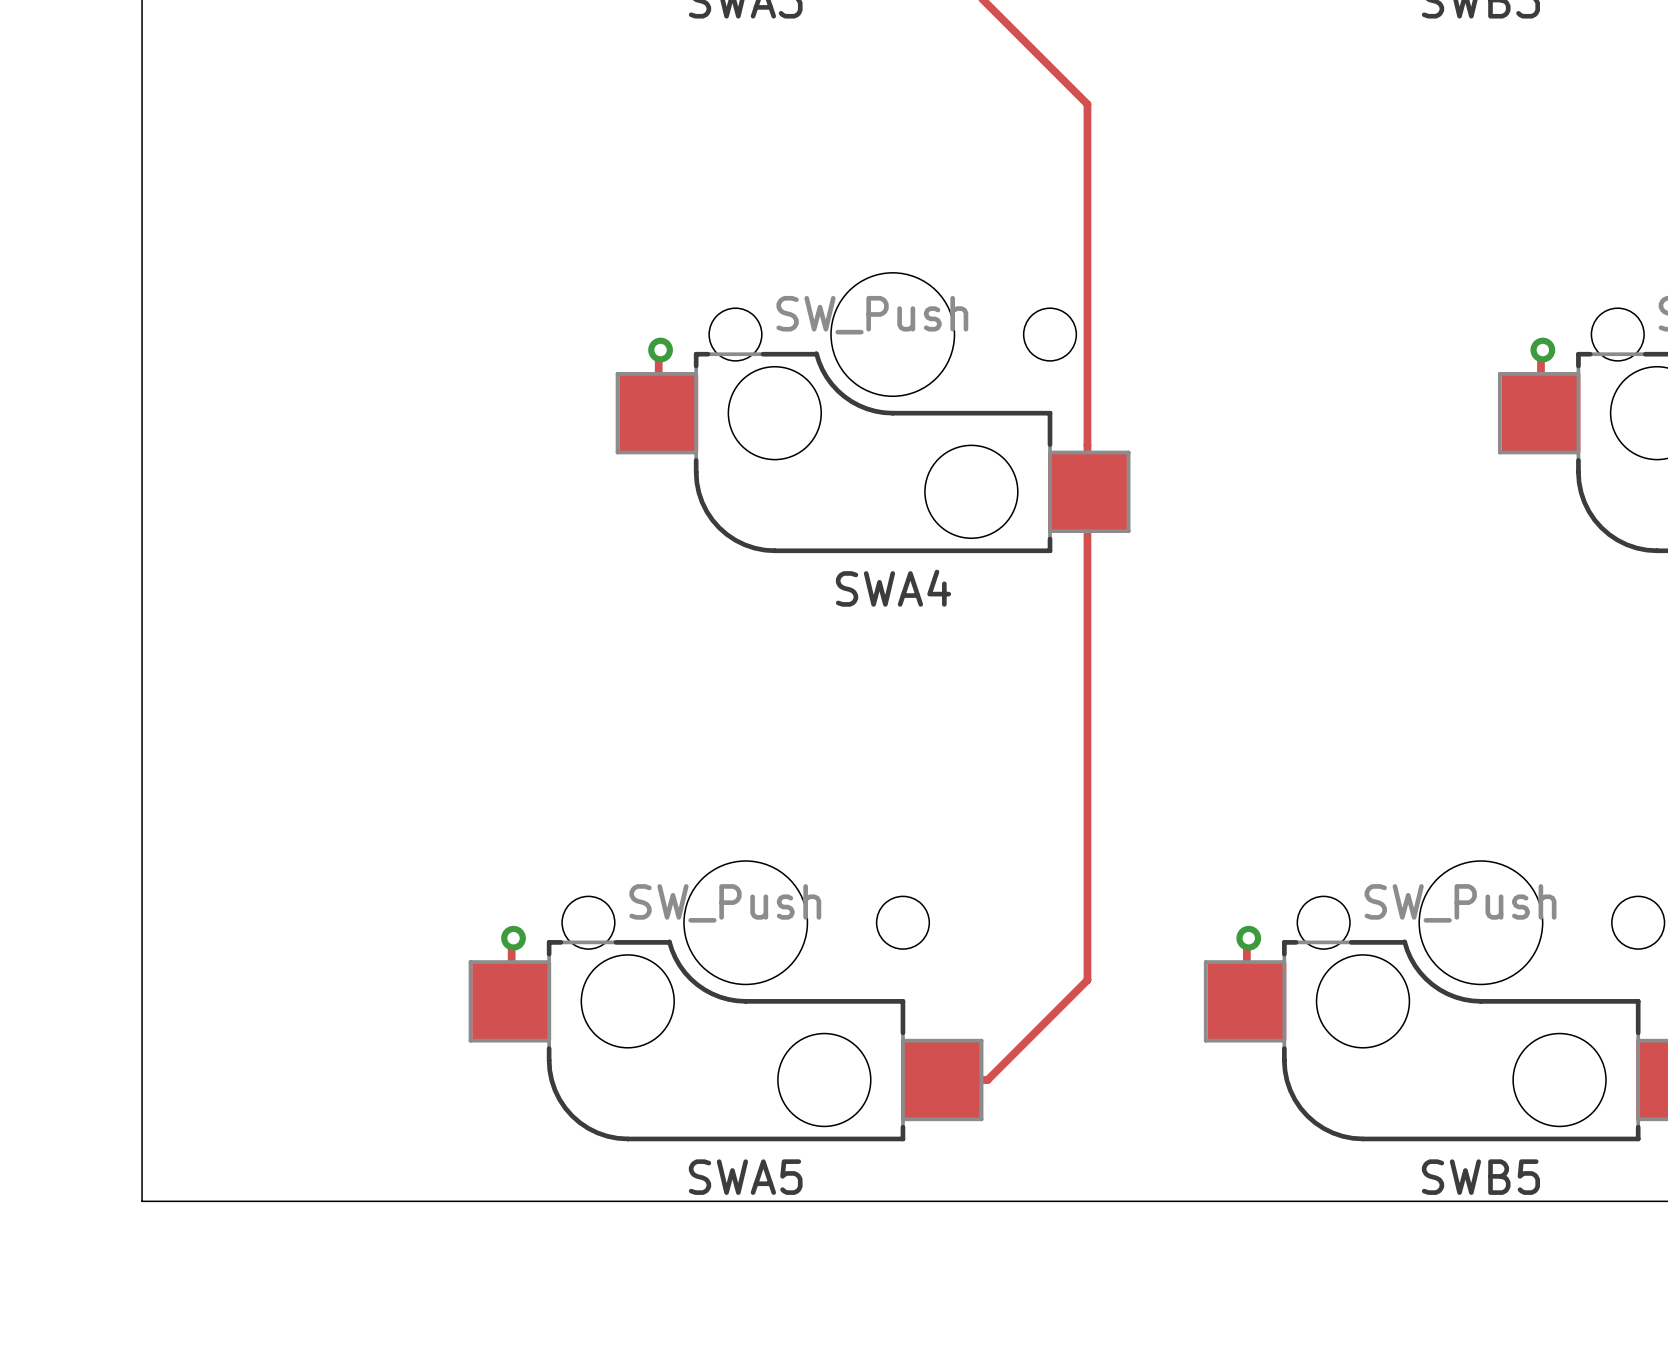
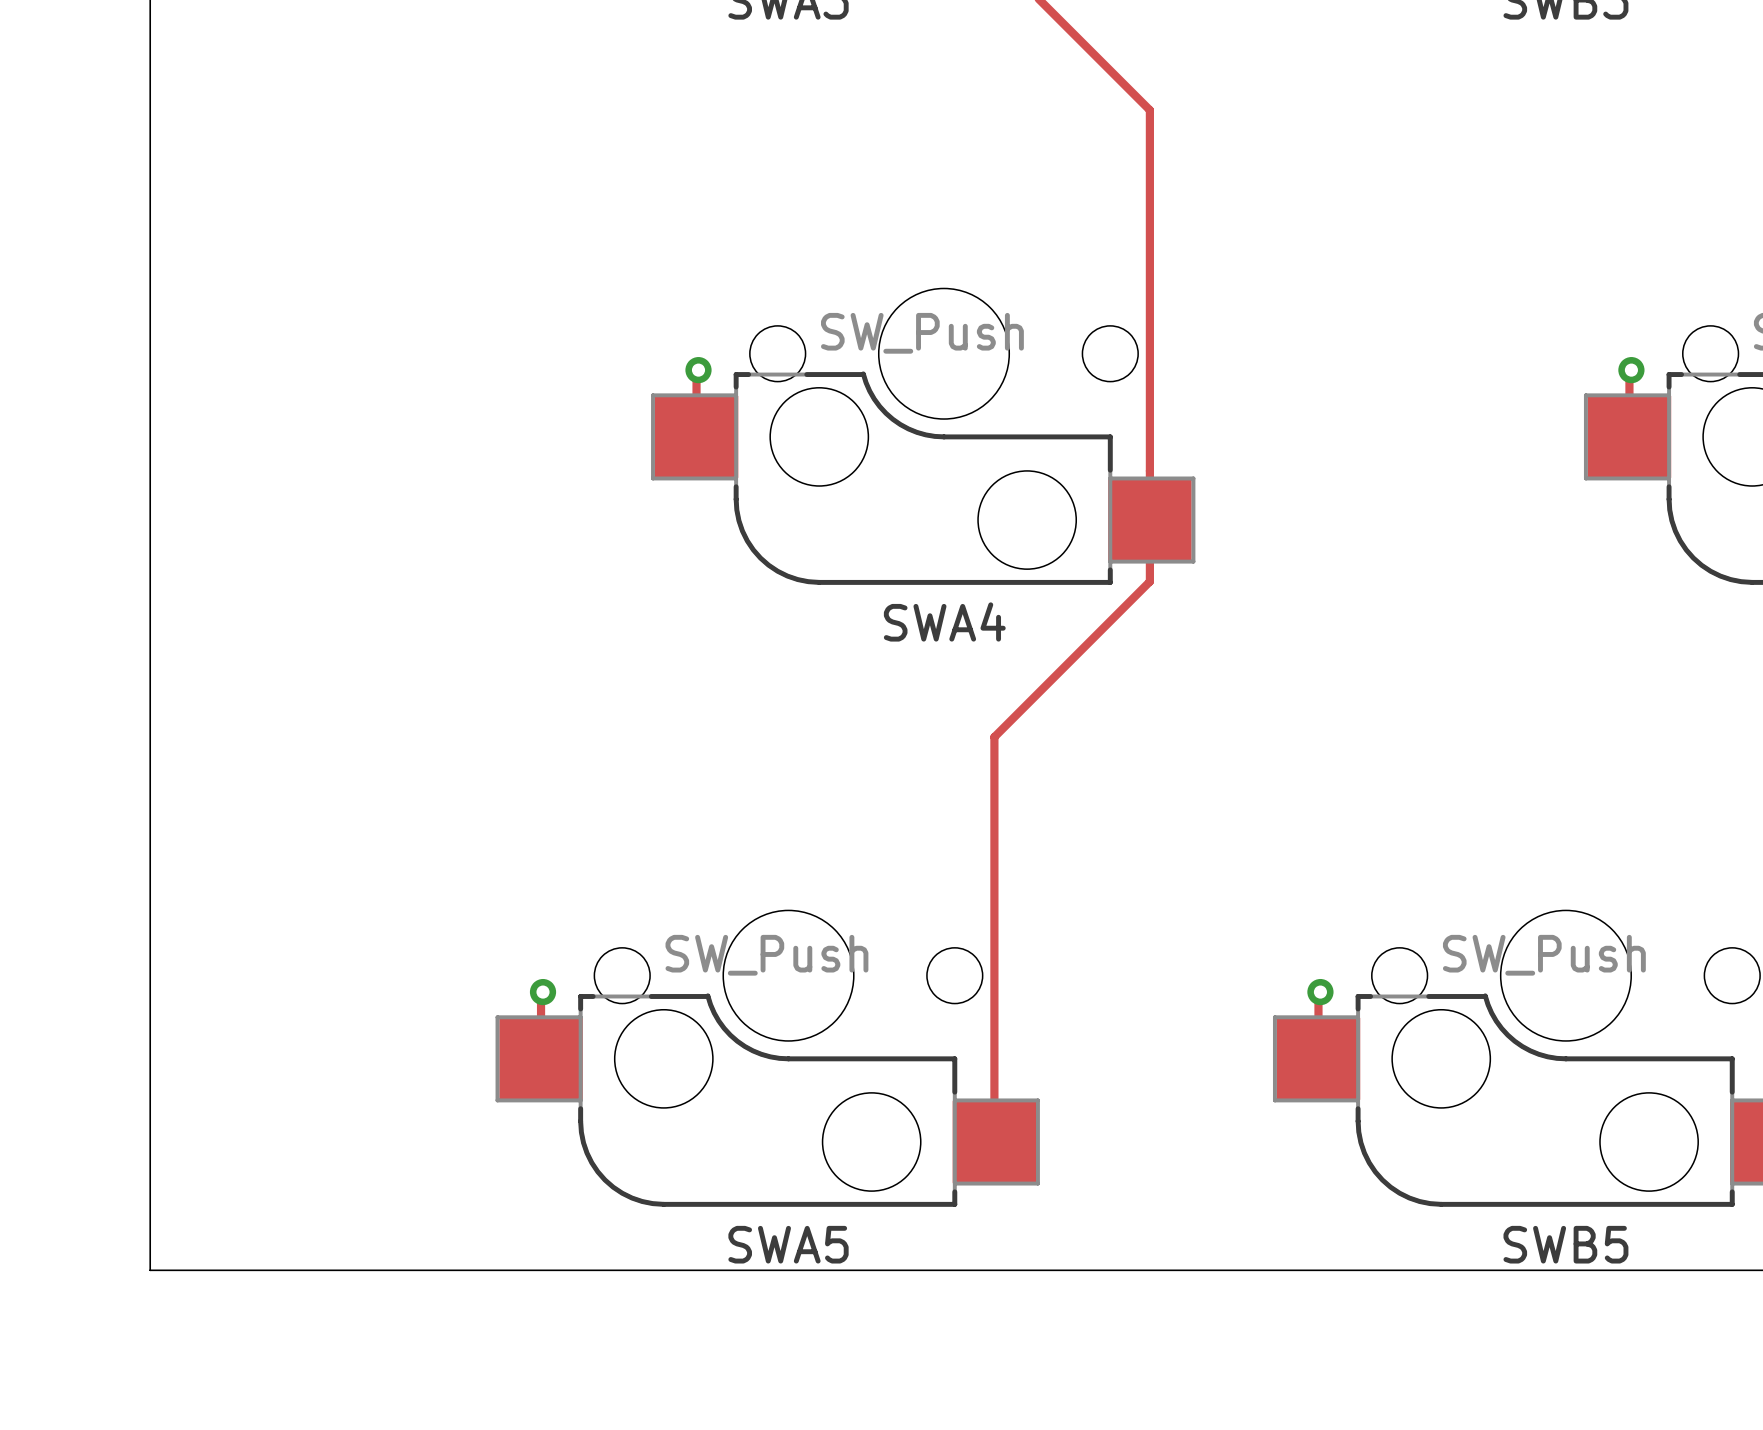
track: (1087, 550) (1087, 980) (987, 1079) (940, 1079) -> (1149, 581) (994, 737) (994, 1141)

